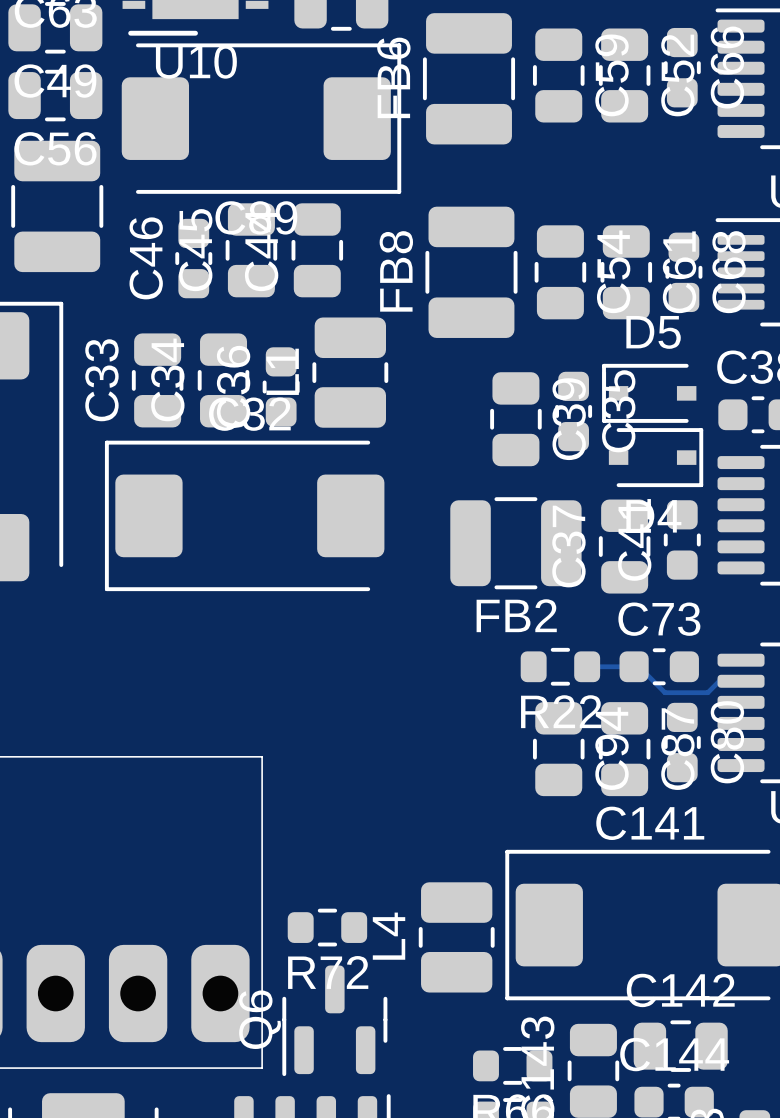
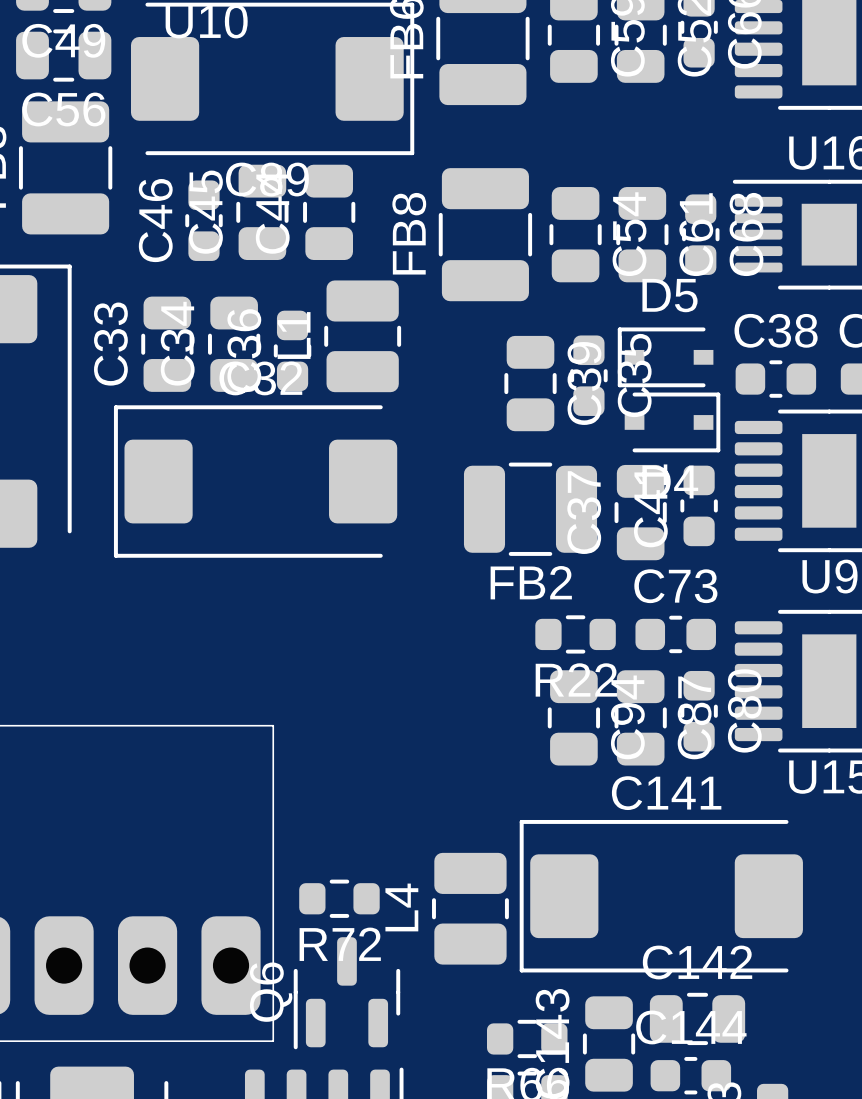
track: (587, 666) (639, 666) (664, 692) (707, 692) (719, 681) (741, 681) -> none

